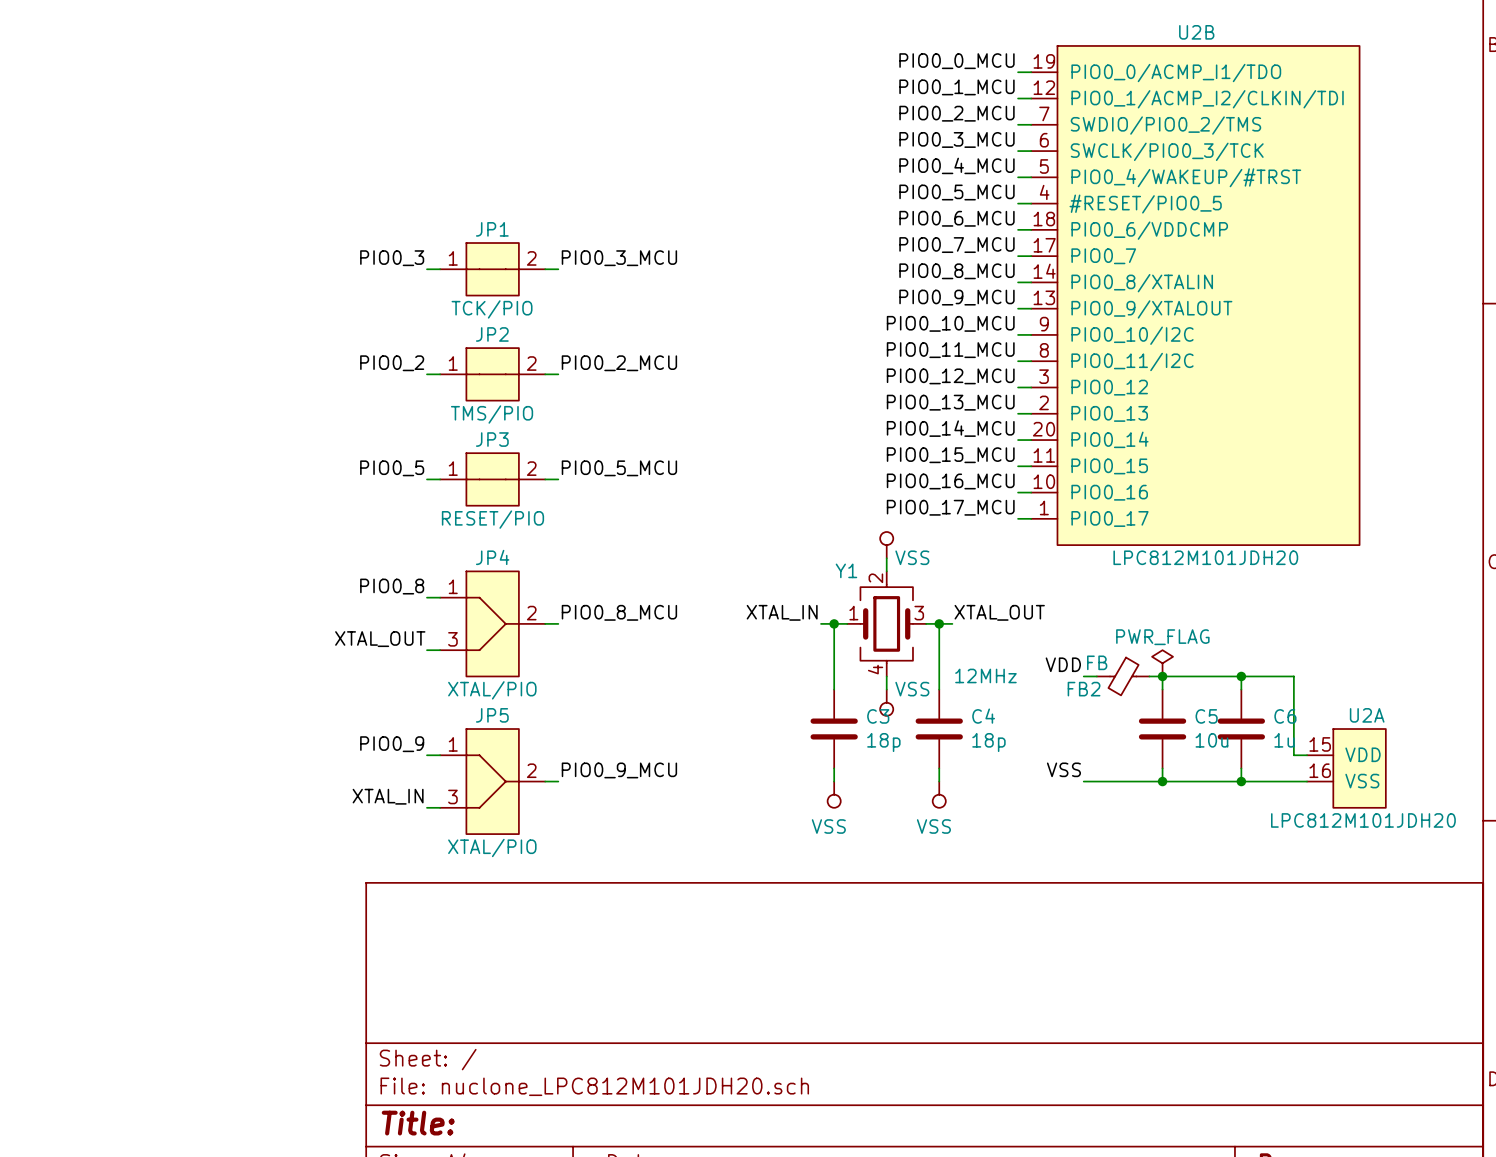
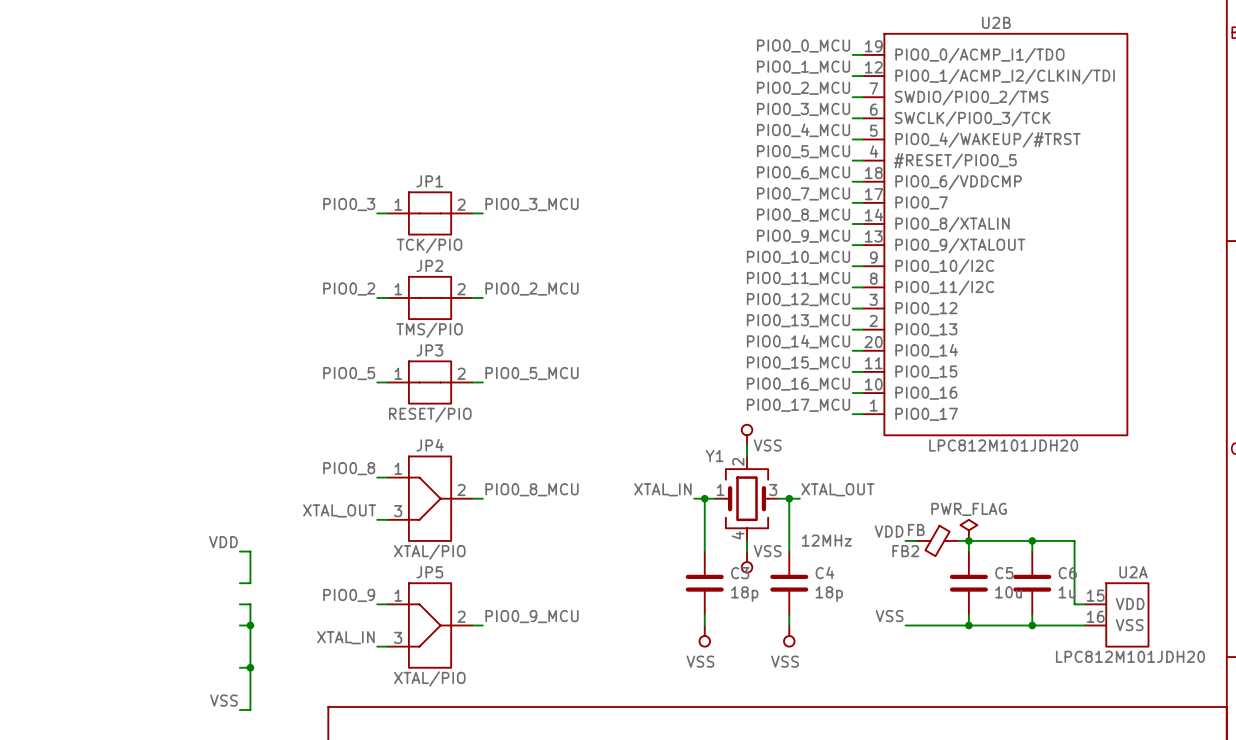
label: none -> VDD (223, 542)
wire: none -> (239, 551) (250, 551) (250, 583) (239, 583)
wire: none -> (239, 604) (250, 604) (250, 710) (239, 710)
wire: none -> (239, 625) (250, 625)
junction: none -> (250, 625)
wire: none -> (239, 667) (250, 667)
junction: none -> (250, 667)
label: none -> VSS (223, 700)

